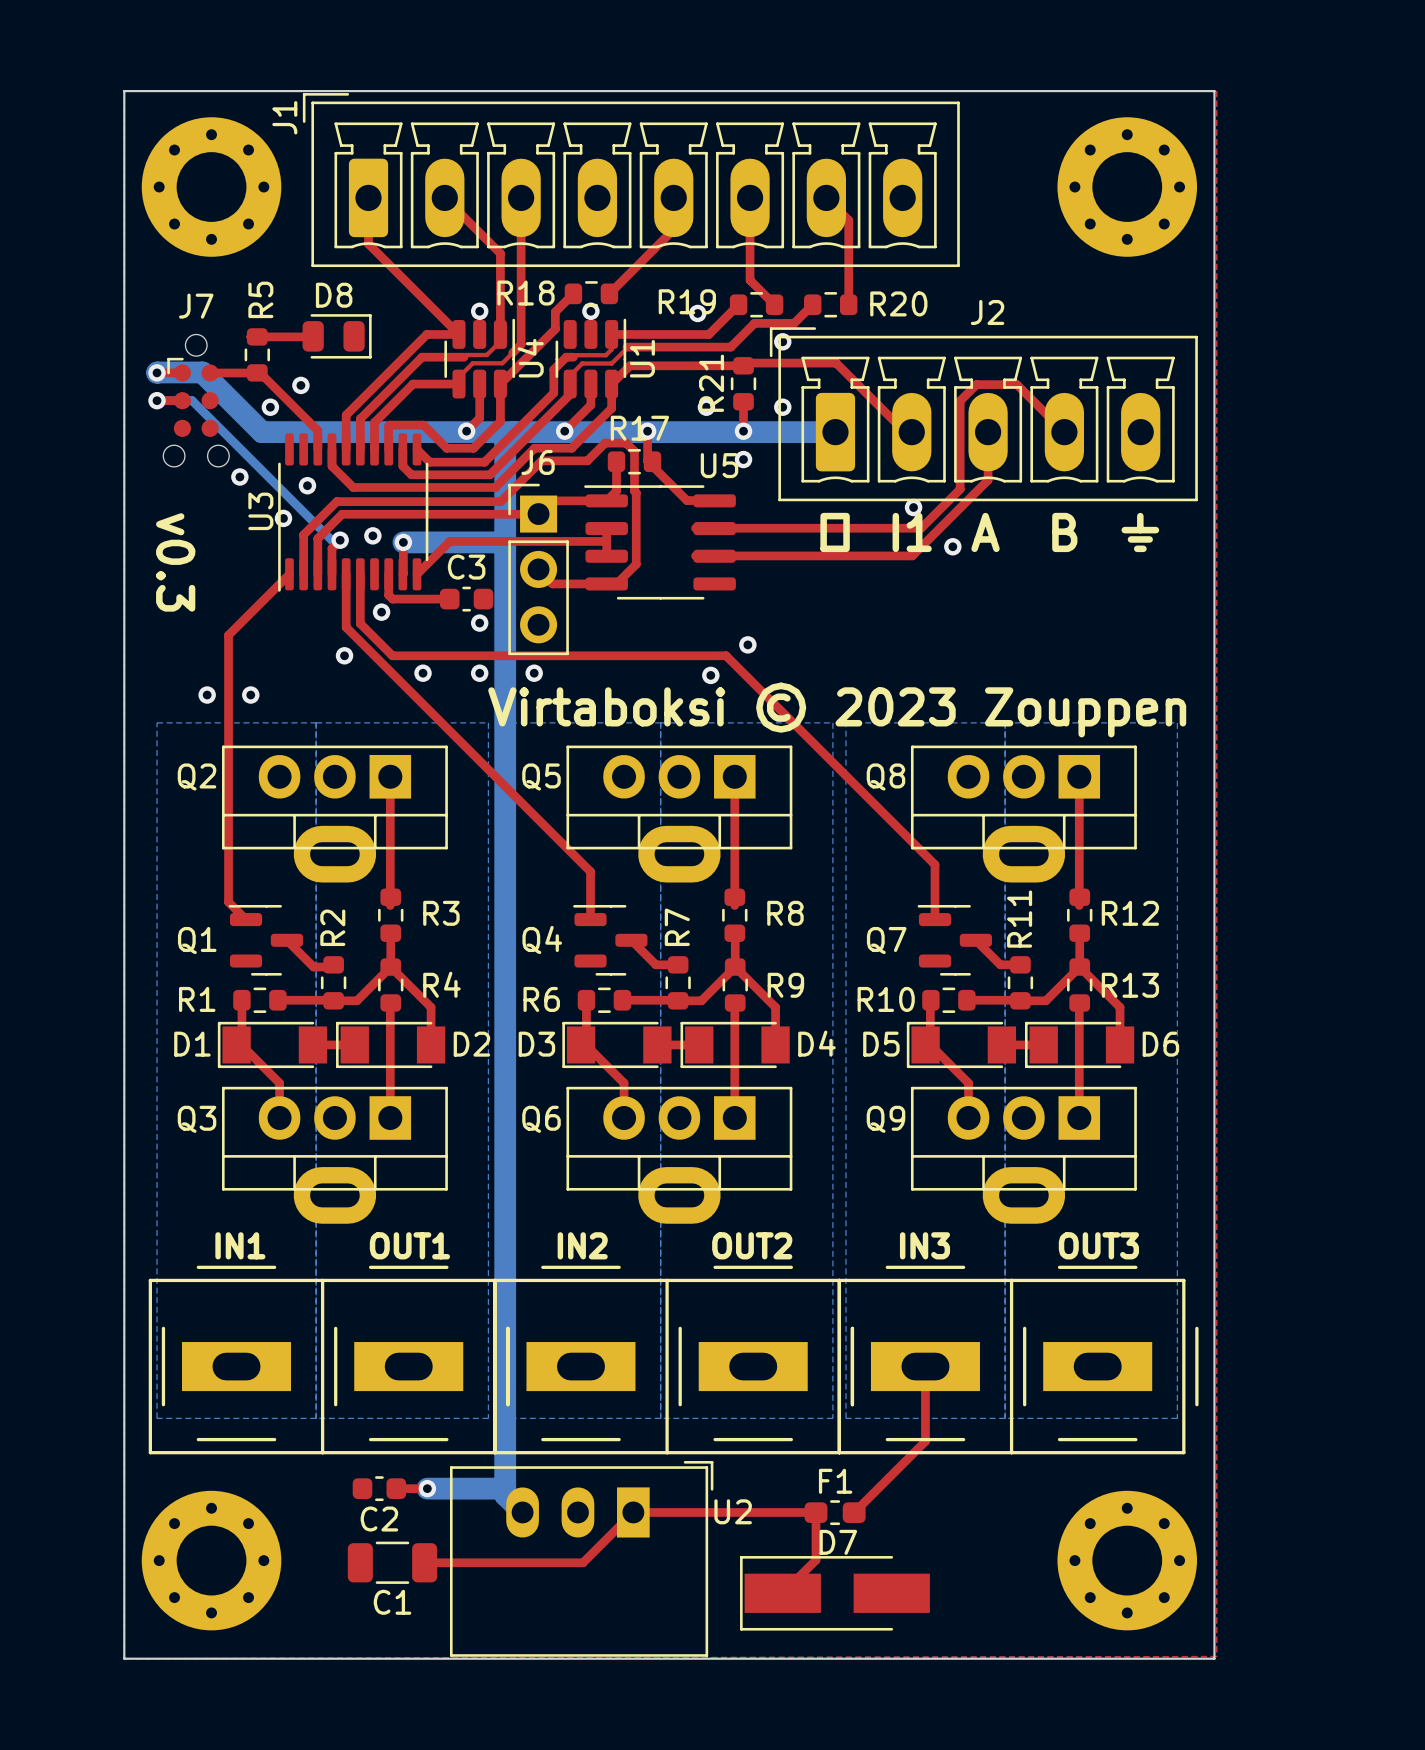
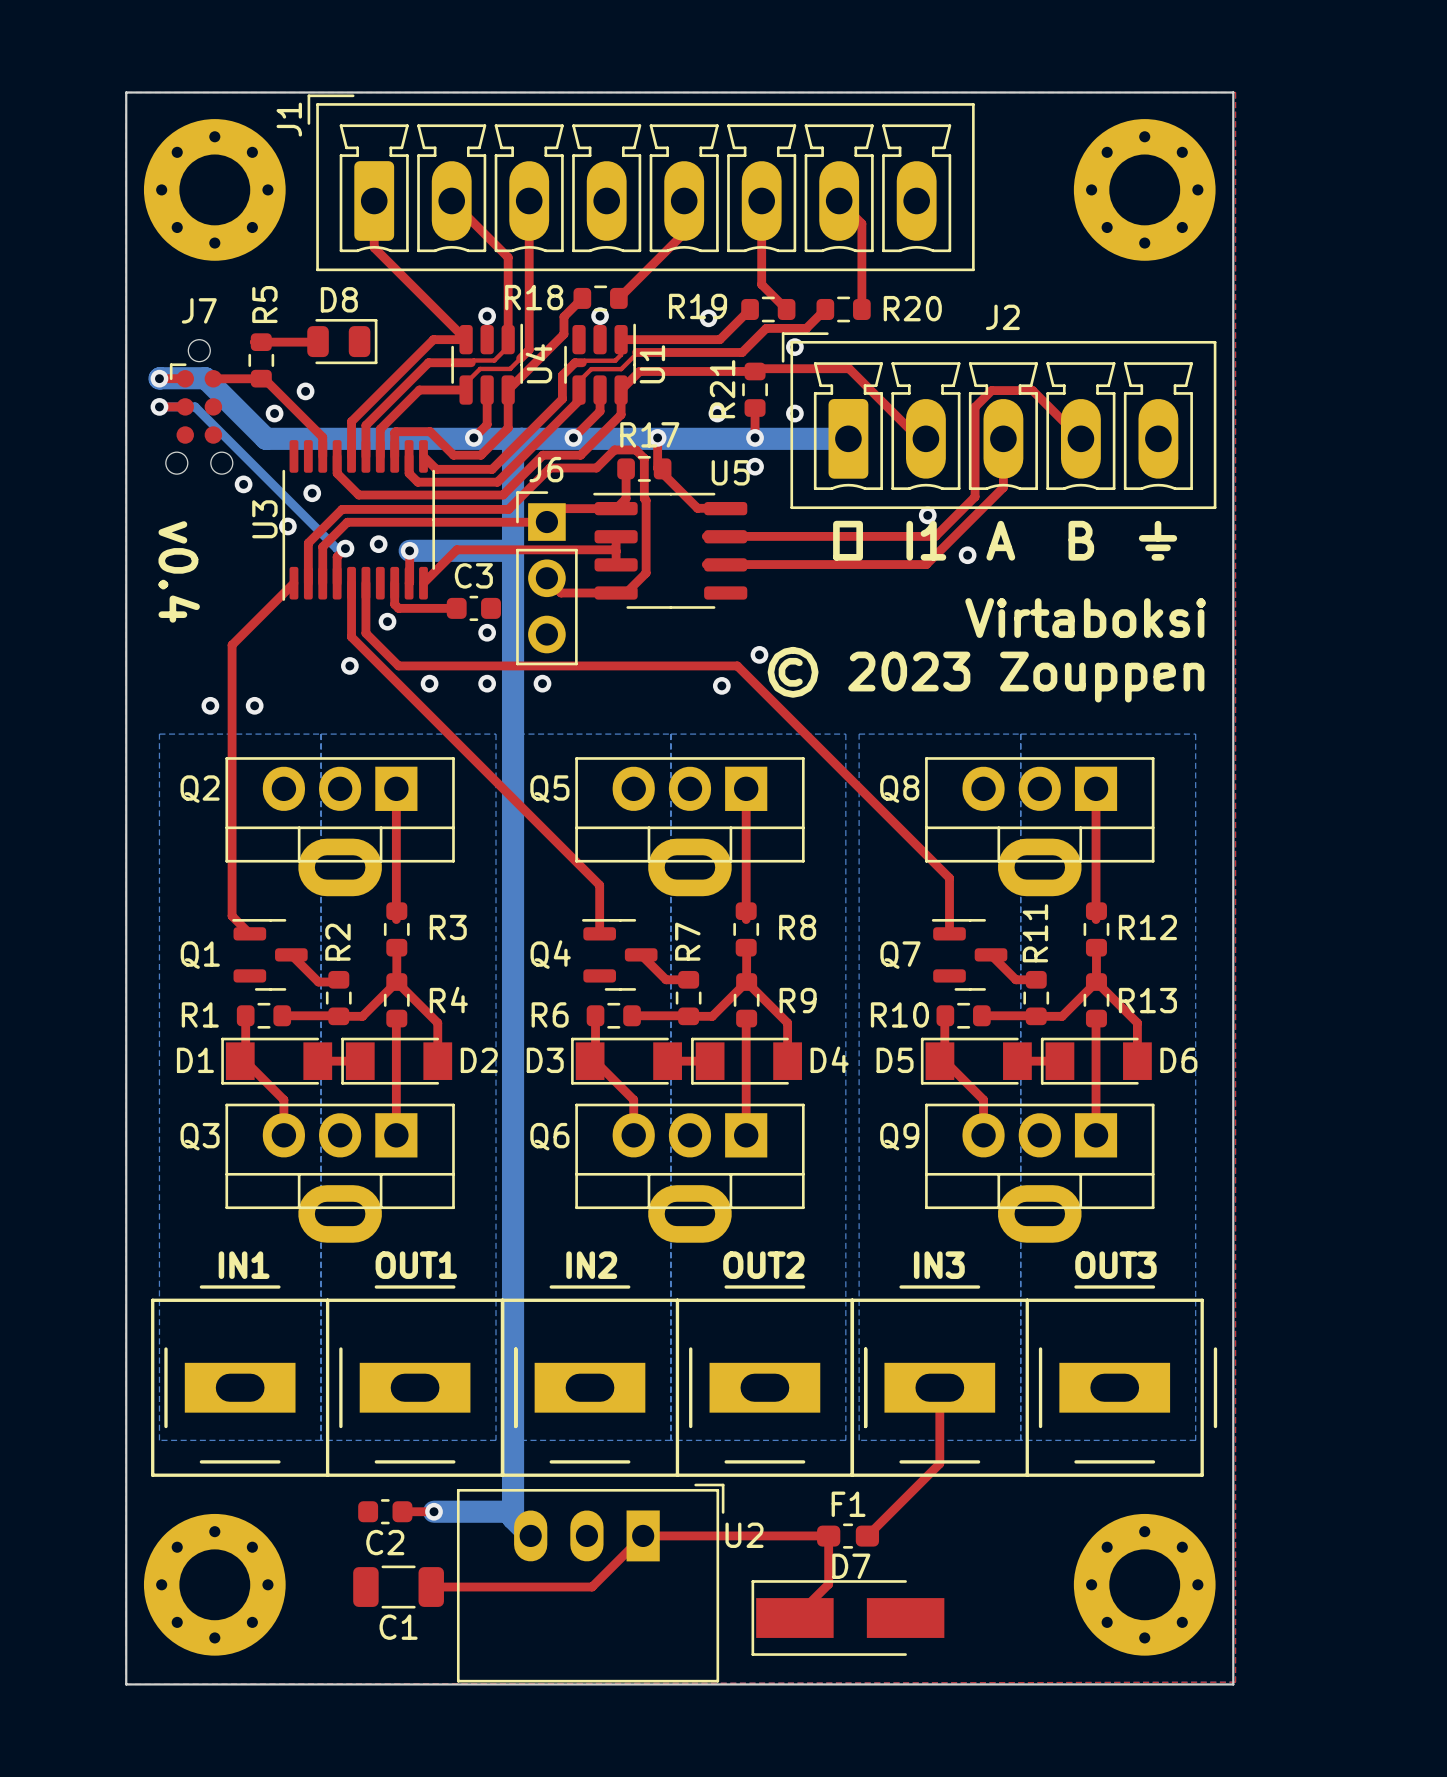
text: v0.3 (175, 562) -> v0.4 (179, 571)
text: none -> Virtaboksi (1085, 618)
text: none -> © 2023 Zouppen (986, 674)
text: Virtaboksi © 2023 Zouppen (837, 709) -> none

